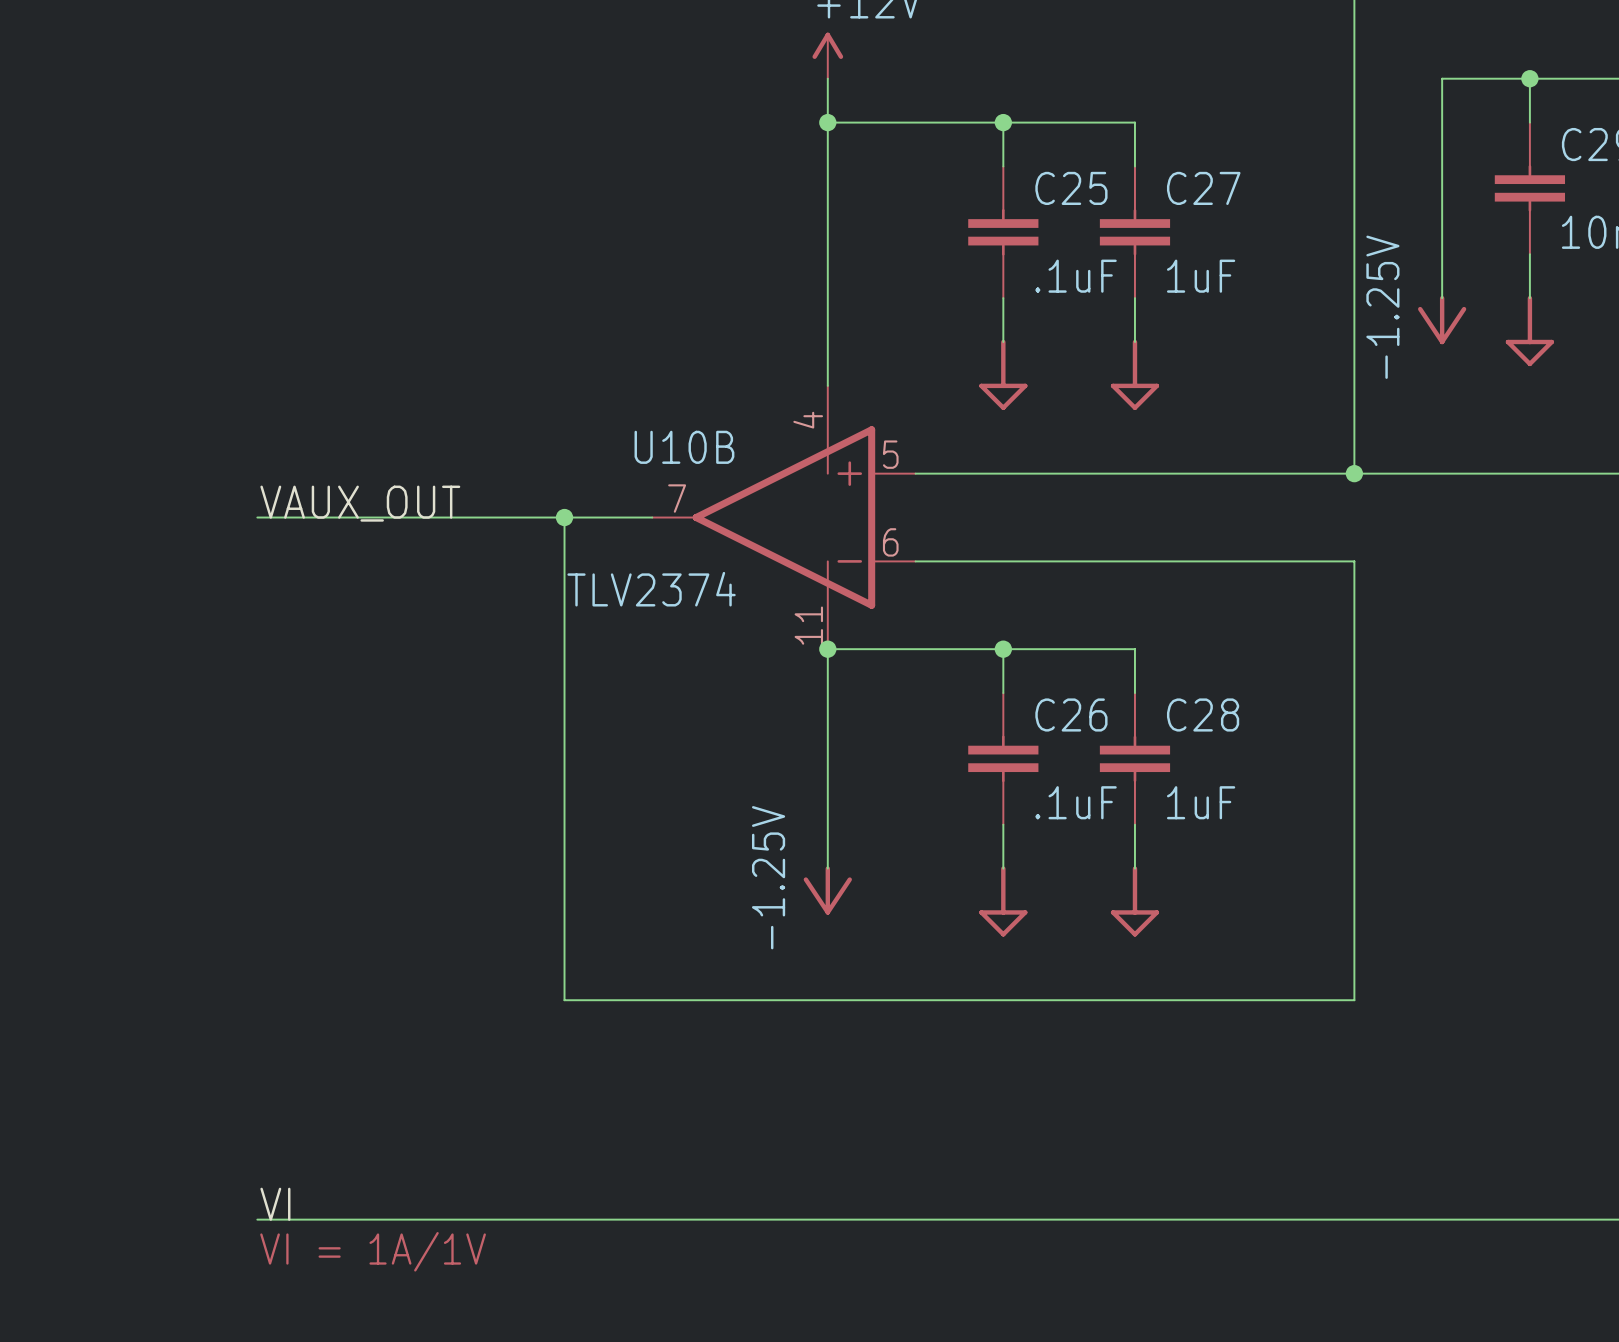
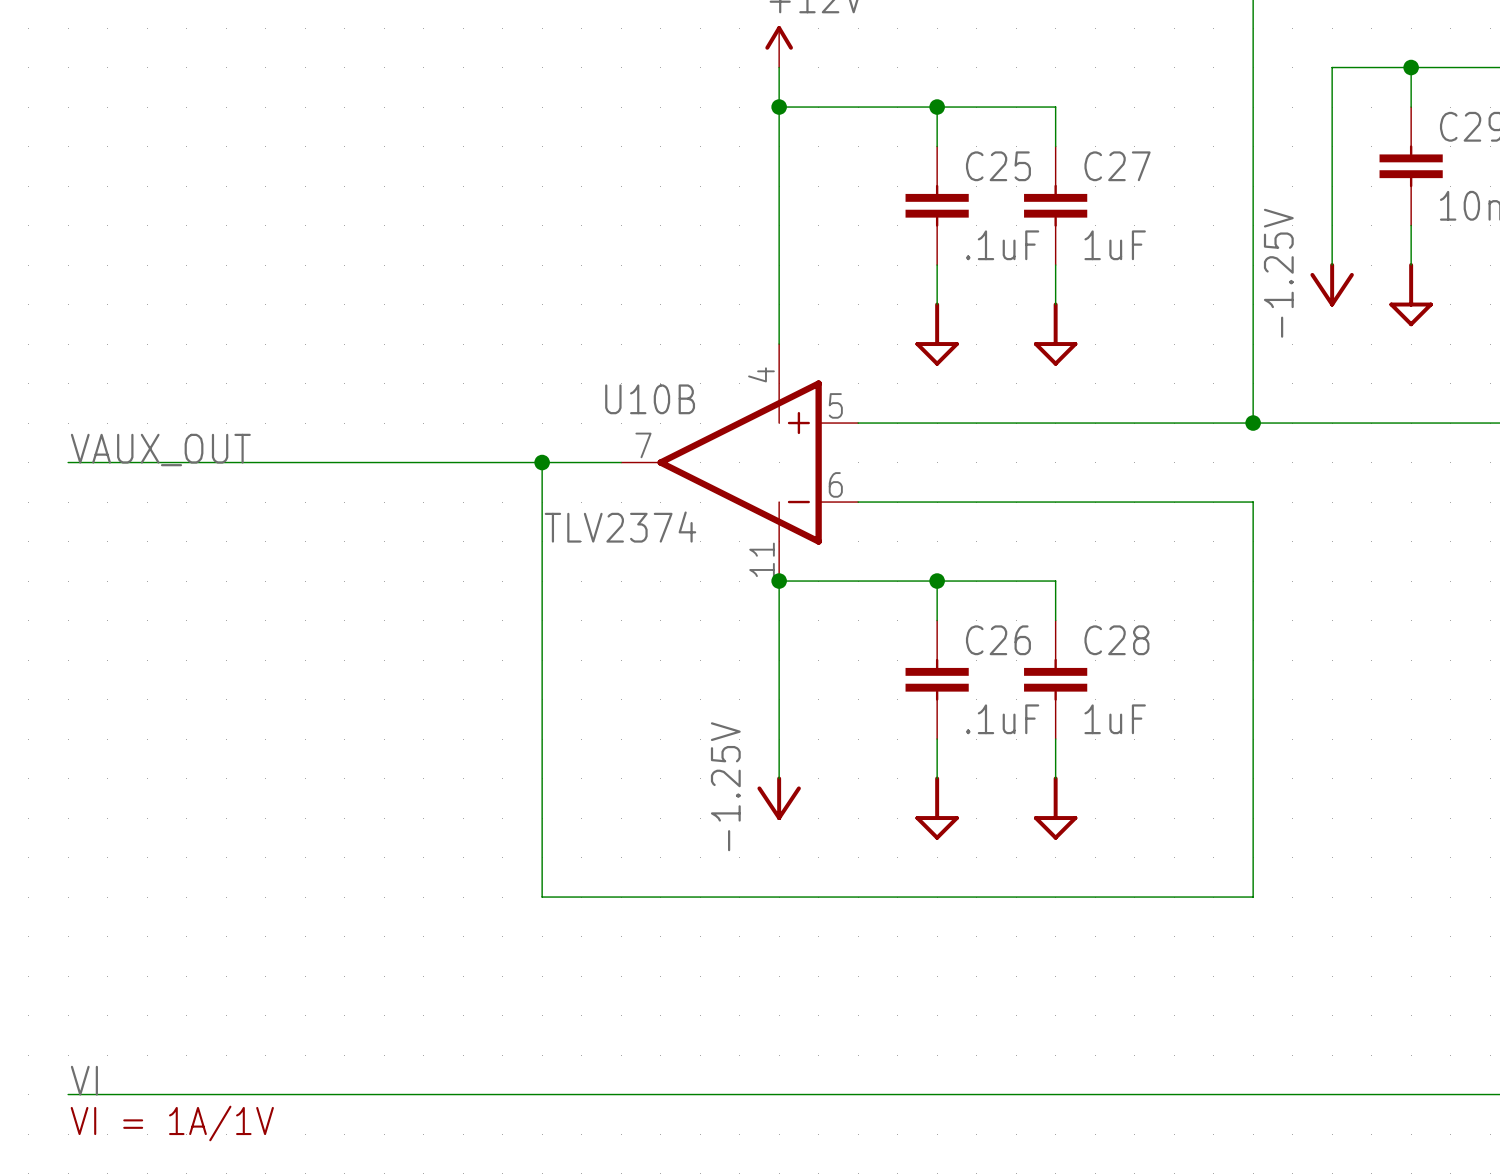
label position: VAUX_OUT (360, 503) -> VAUX_OUT (160, 450)
wire: none -> (68, 462) (265, 462)
label position: VI (275, 1204) -> VI (84, 1080)
wire: none -> (68, 1094) (265, 1094)
text position: VI = 1A/1V (373, 1251) -> VI = 1A/1V (172, 1123)

